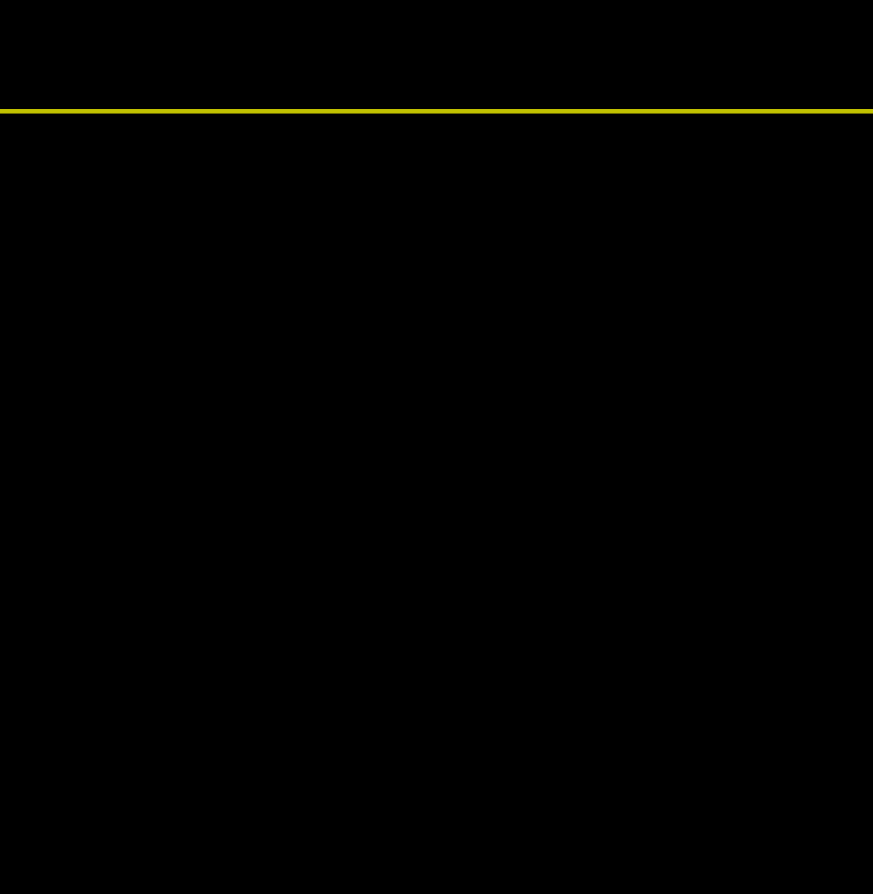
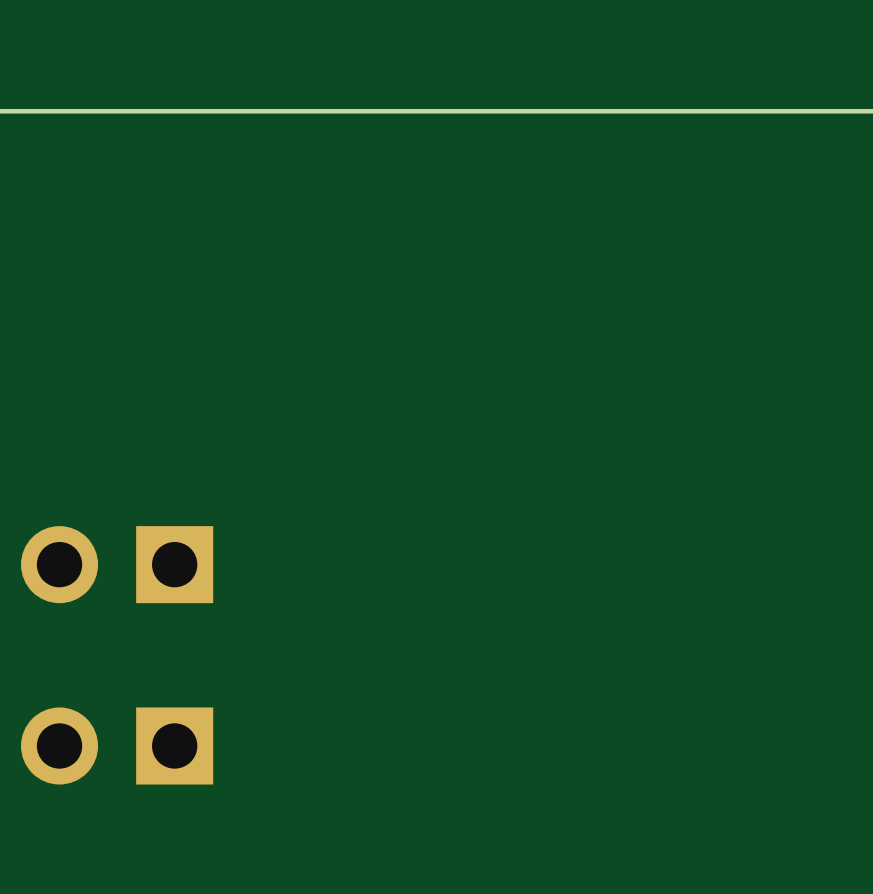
part: none -> (117, 564)
part: none -> (117, 745)

